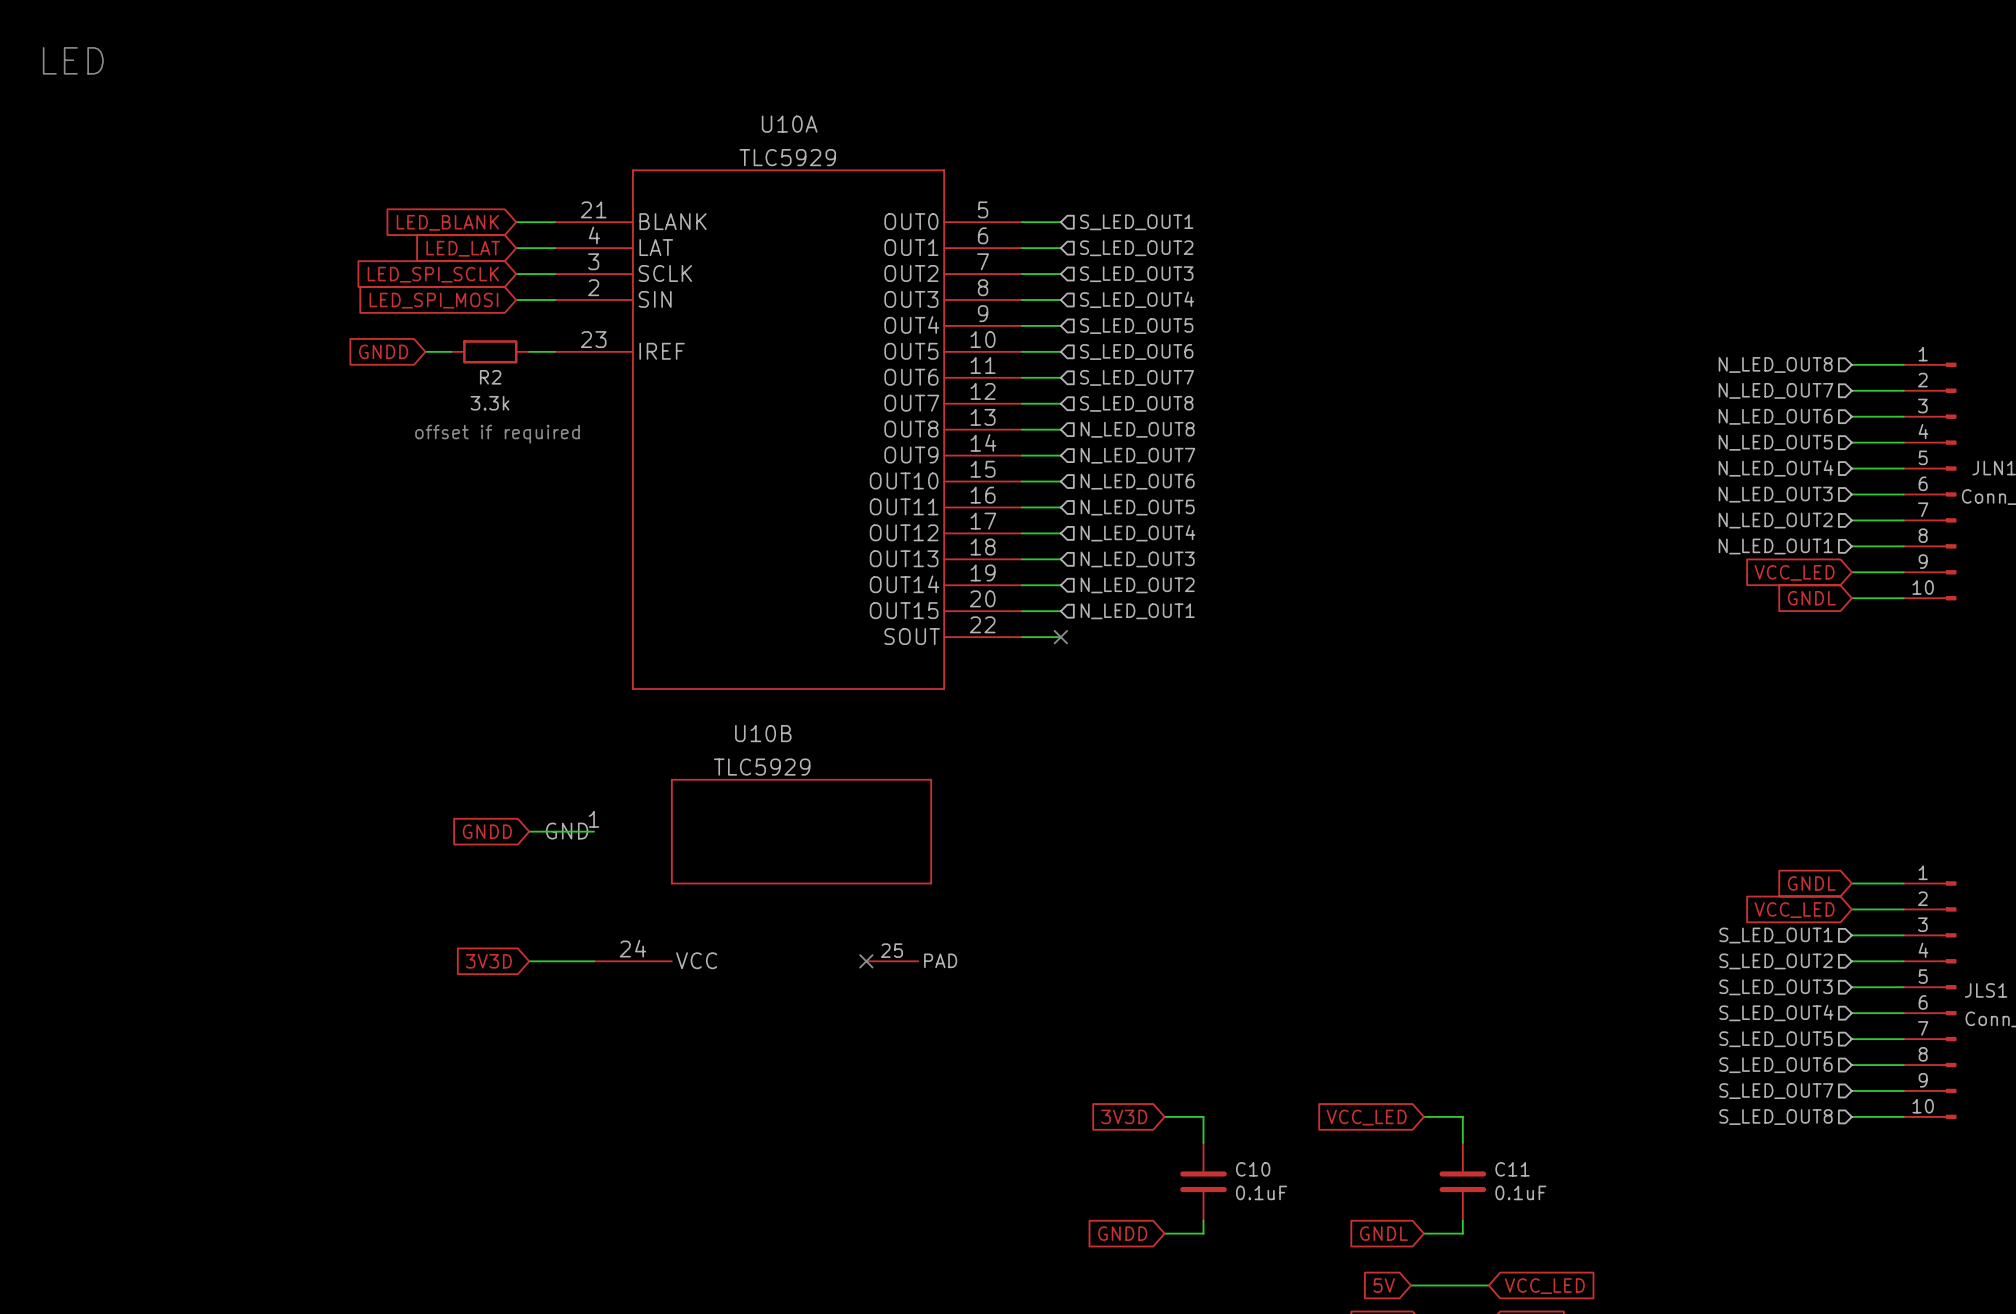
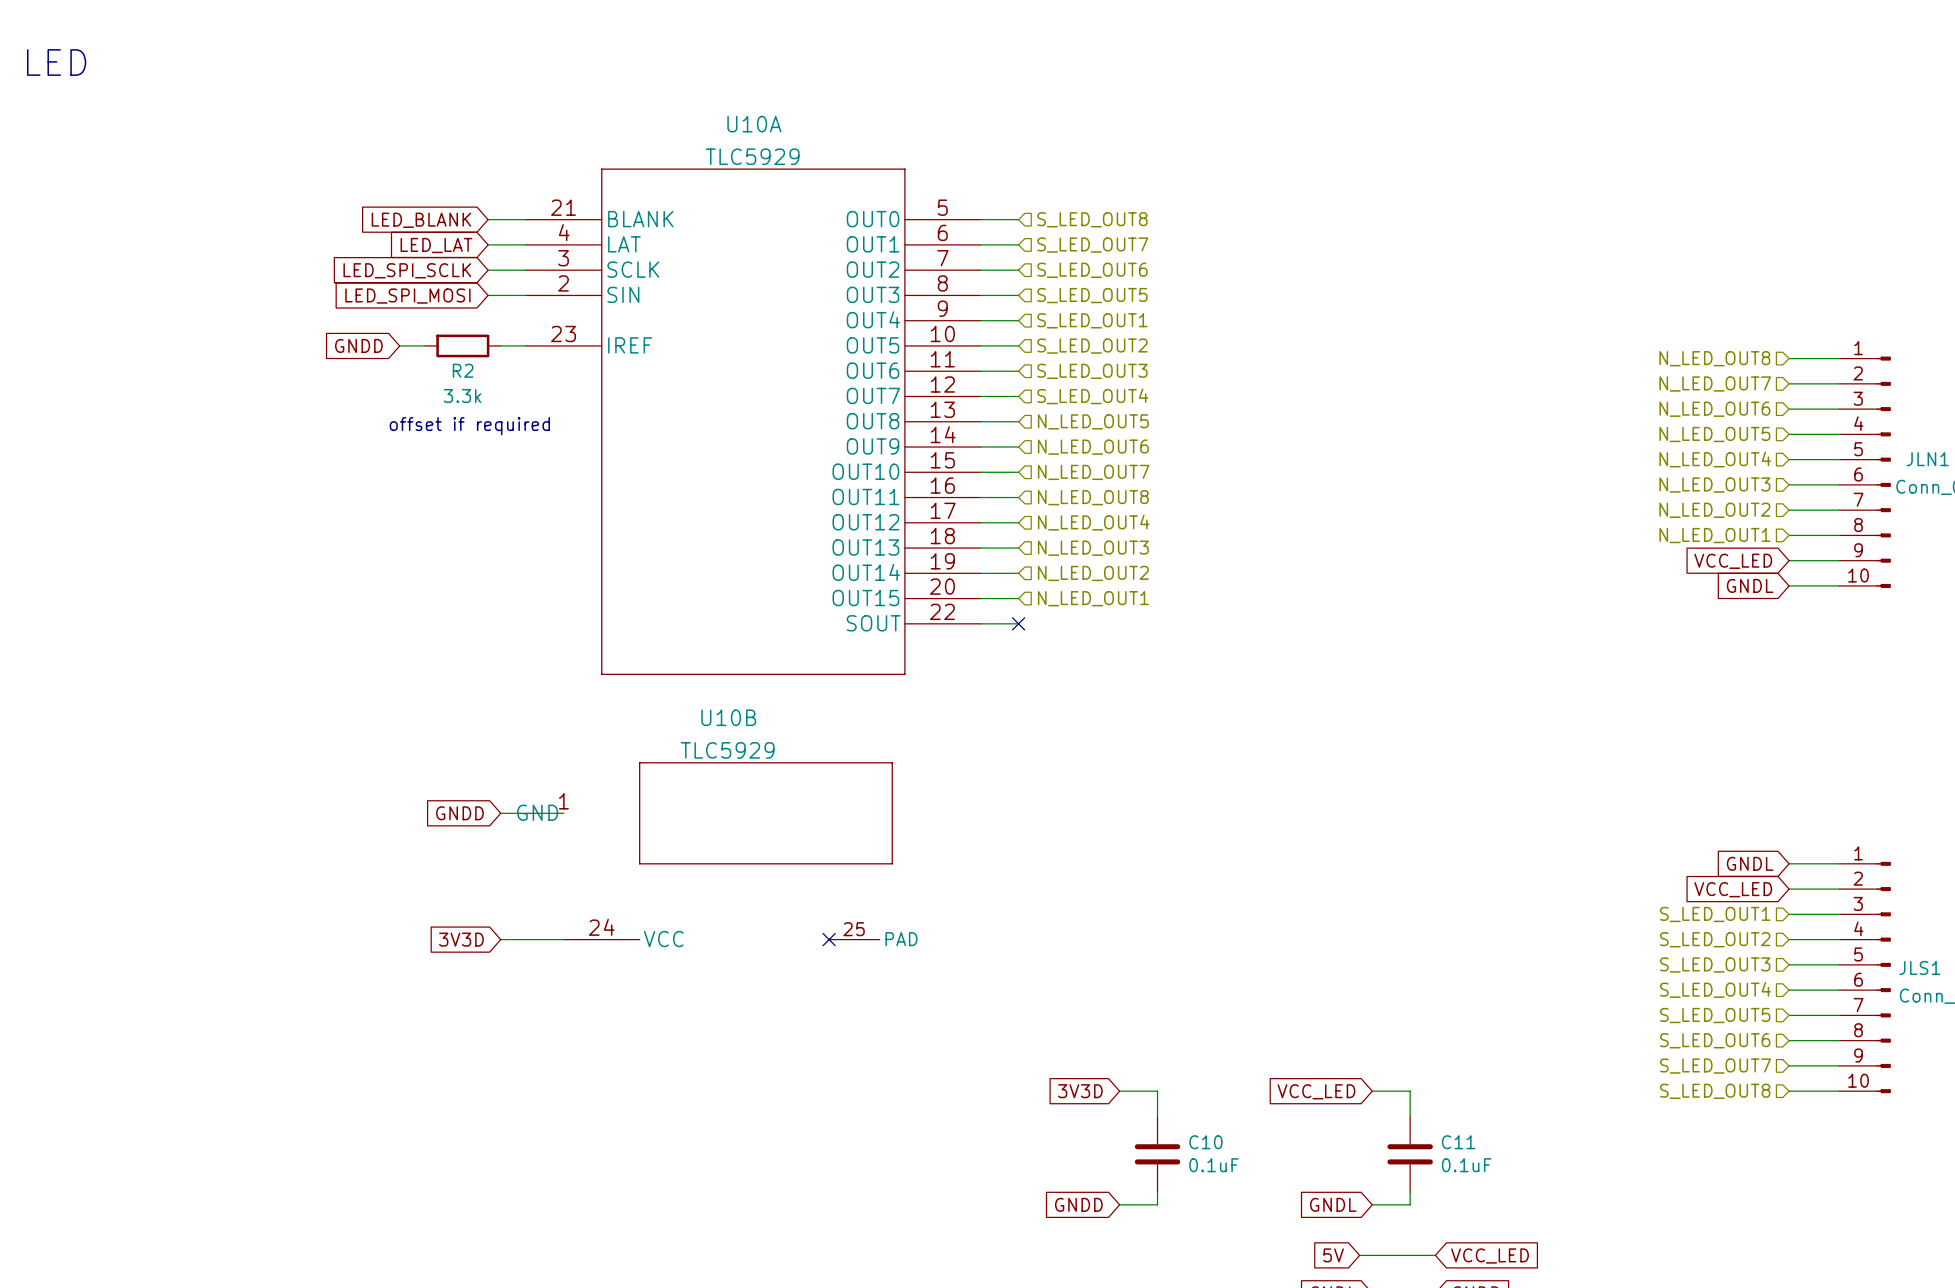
hierarchical label: S_LED_OUT1 (1136, 222) -> S_LED_OUT8 (1092, 219)
hierarchical label: S_LED_OUT2 (1136, 248) -> S_LED_OUT7 (1092, 245)
hierarchical label: S_LED_OUT3 (1136, 274) -> S_LED_OUT6 (1092, 270)
hierarchical label: S_LED_OUT4 (1137, 299) -> S_LED_OUT5 (1092, 295)
hierarchical label: S_LED_OUT5 (1136, 326) -> S_LED_OUT1 (1092, 320)
hierarchical label: S_LED_OUT6 (1136, 351) -> S_LED_OUT2 (1092, 346)
hierarchical label: S_LED_OUT7 (1137, 377) -> S_LED_OUT3 (1092, 371)
hierarchical label: S_LED_OUT8 (1136, 403) -> S_LED_OUT4 (1092, 396)
hierarchical label: N_LED_OUT8 (1137, 429) -> N_LED_OUT5 (1093, 421)
hierarchical label: N_LED_OUT7 (1137, 455) -> N_LED_OUT6 (1093, 447)
hierarchical label: N_LED_OUT6 (1137, 481) -> N_LED_OUT7 (1093, 472)
hierarchical label: N_LED_OUT5 (1137, 507) -> N_LED_OUT8 (1093, 497)

